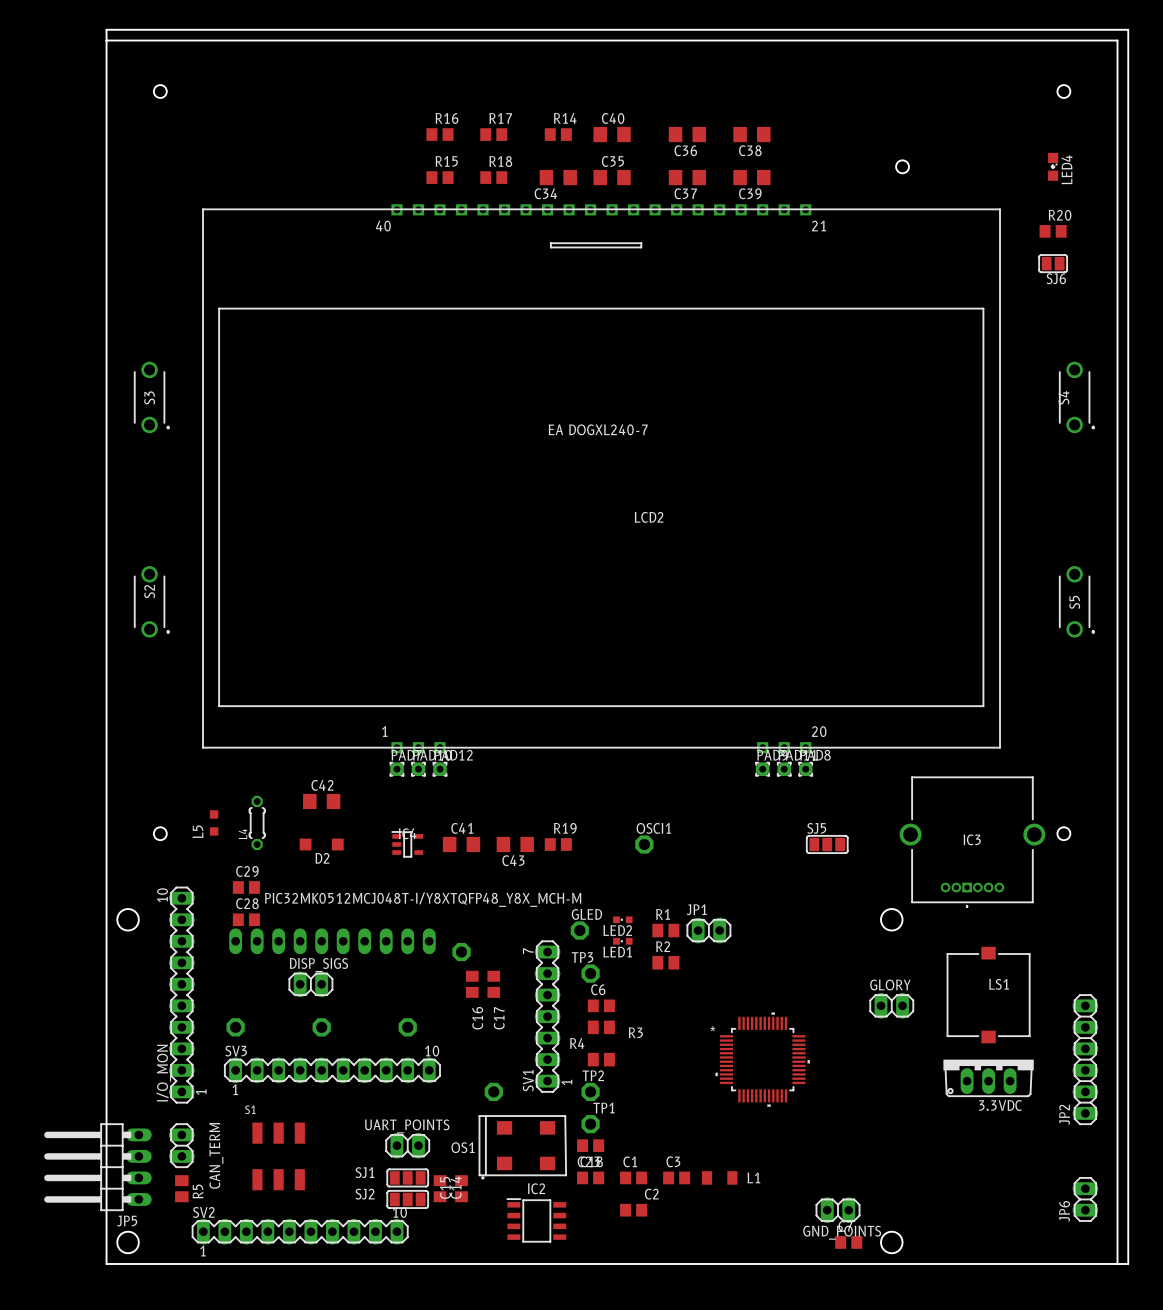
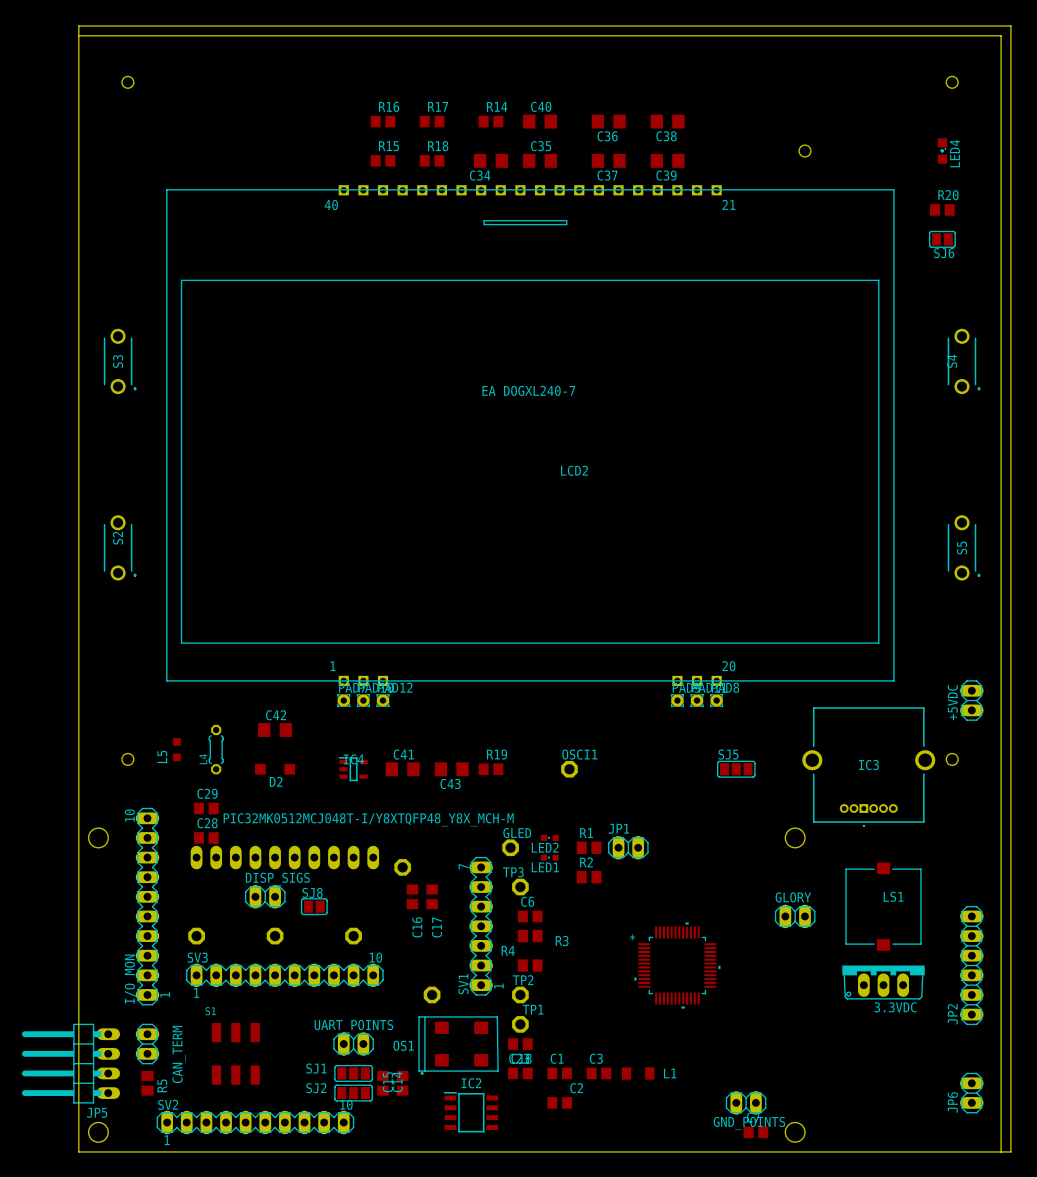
+5VDC: none -> (971, 700)
SJ8: none -> (314, 906)

